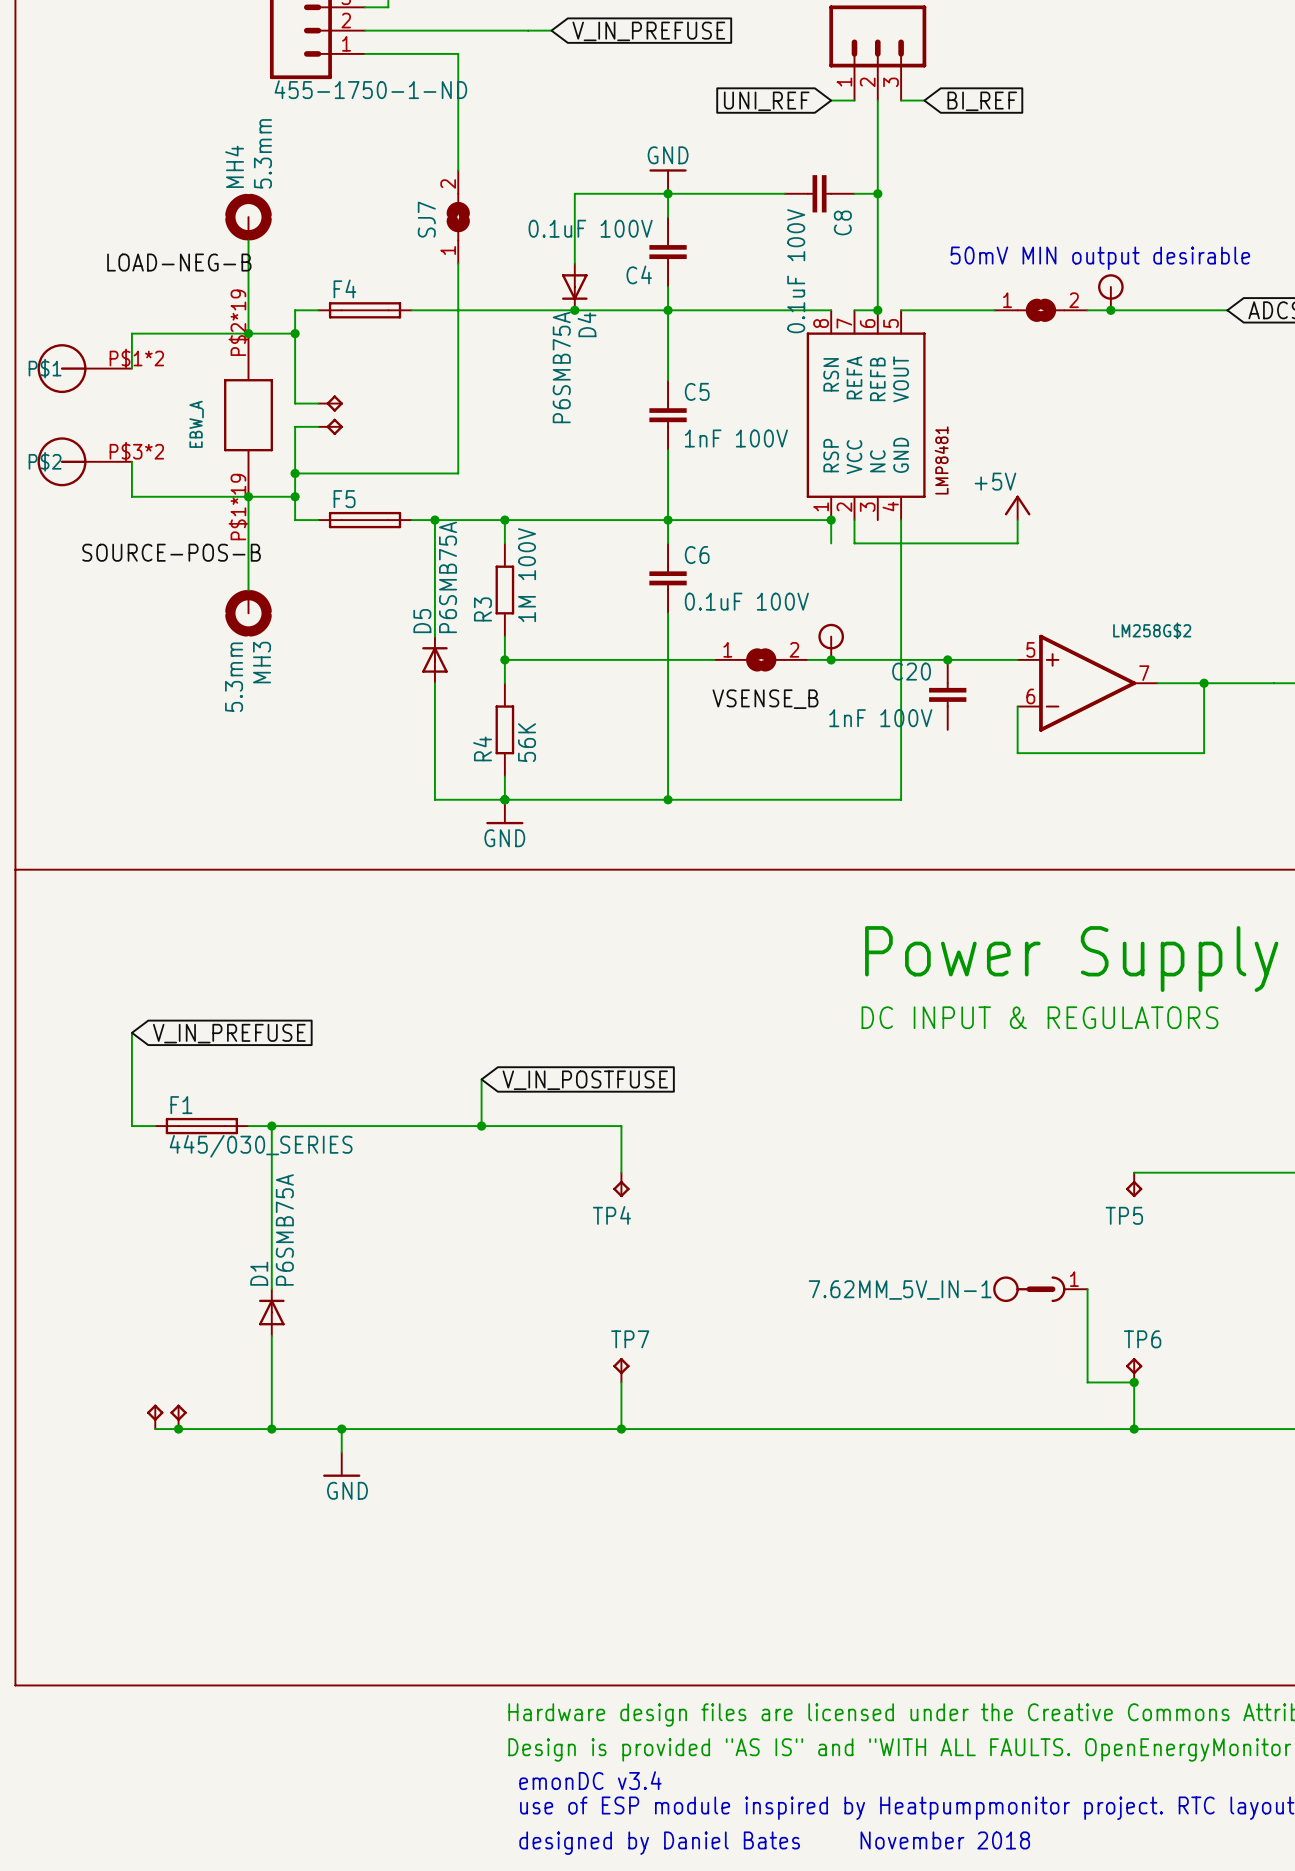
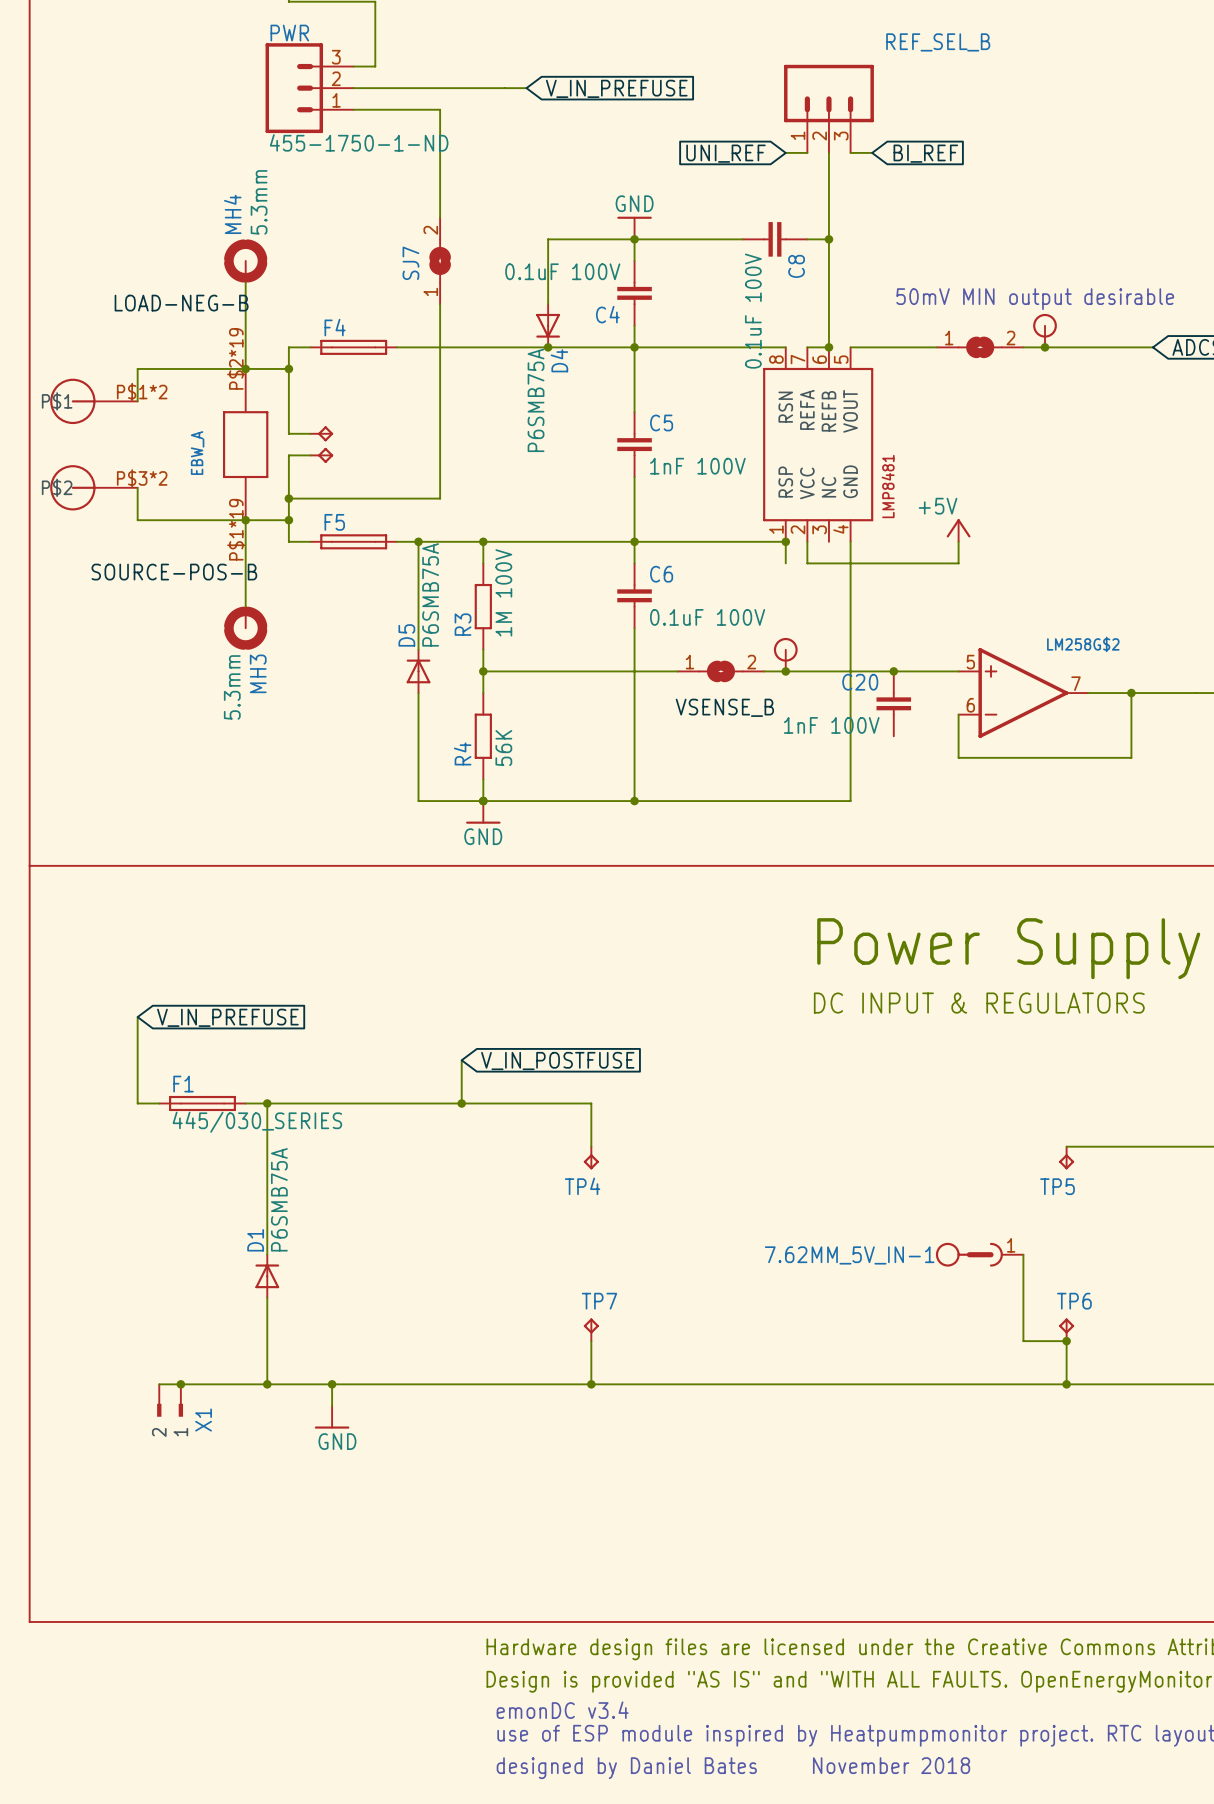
part: (155, 1416) -> none
part: (178, 1416) -> none
X1: none -> (170, 1400)

